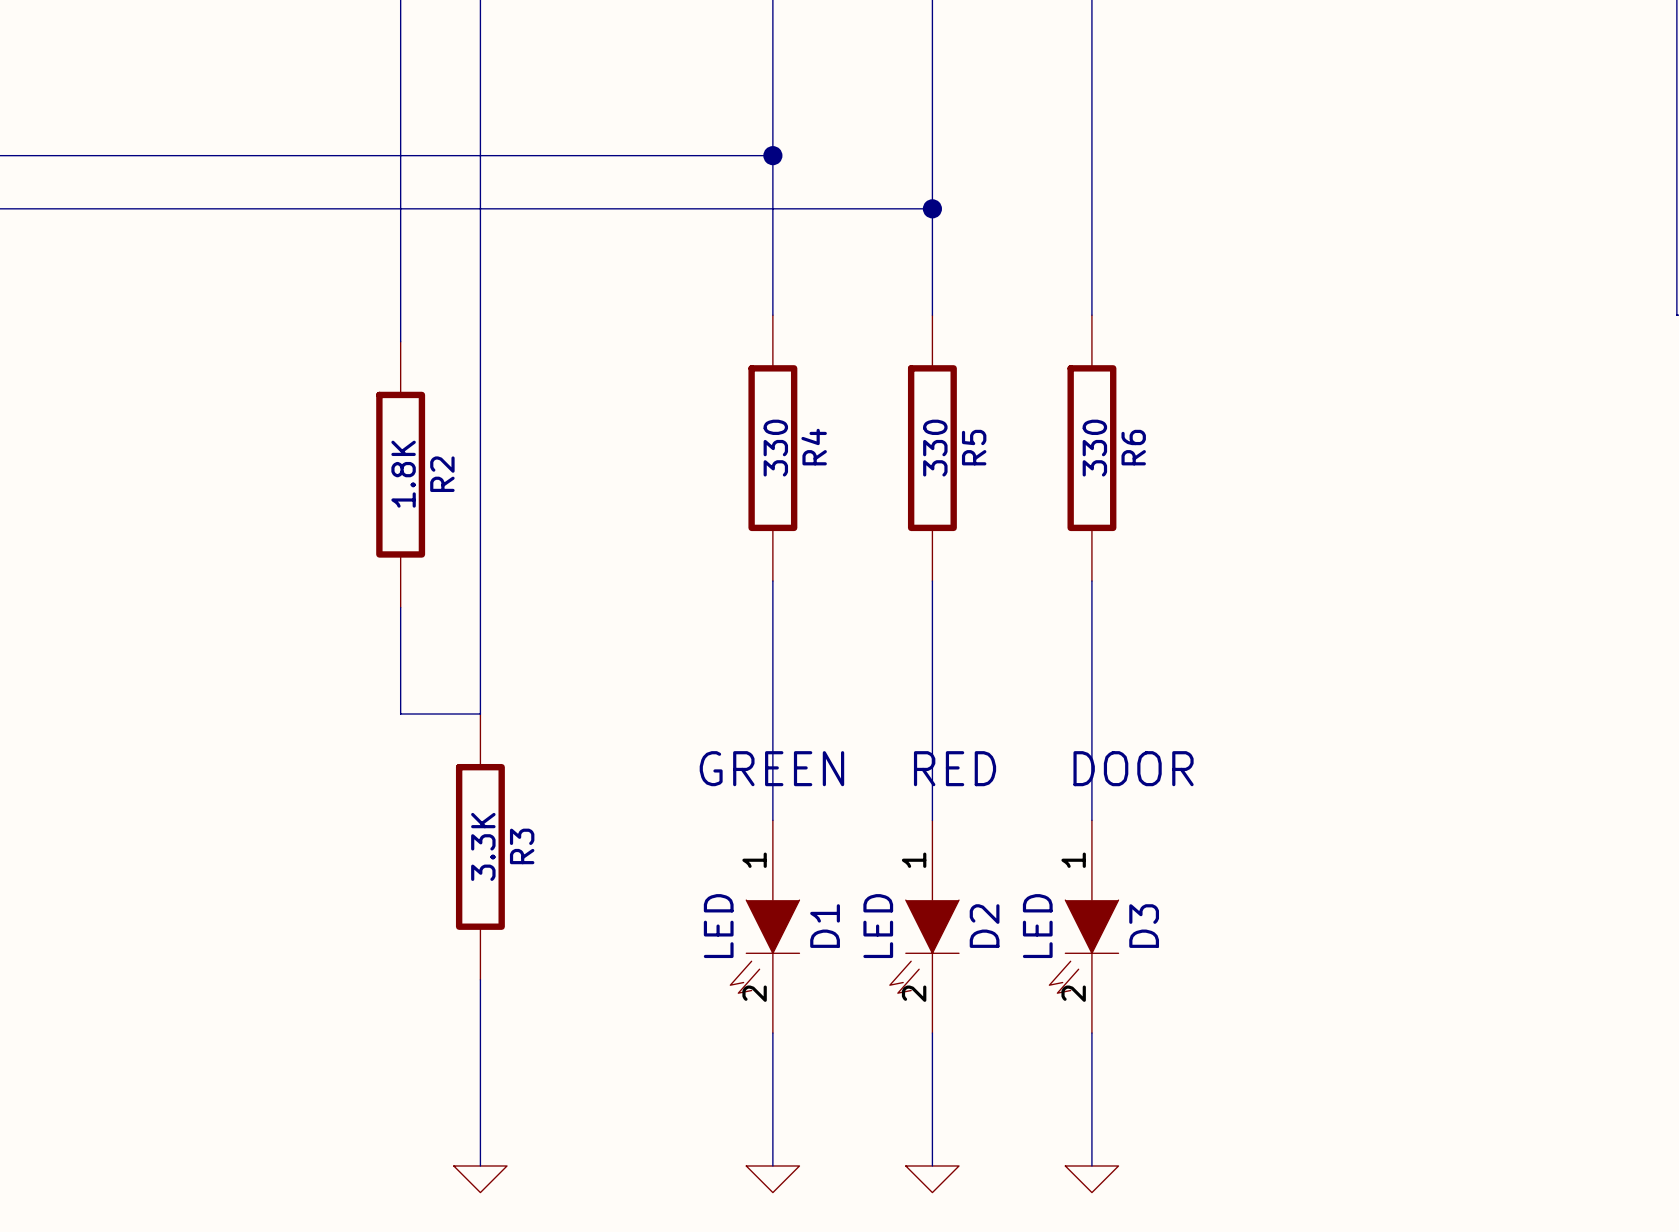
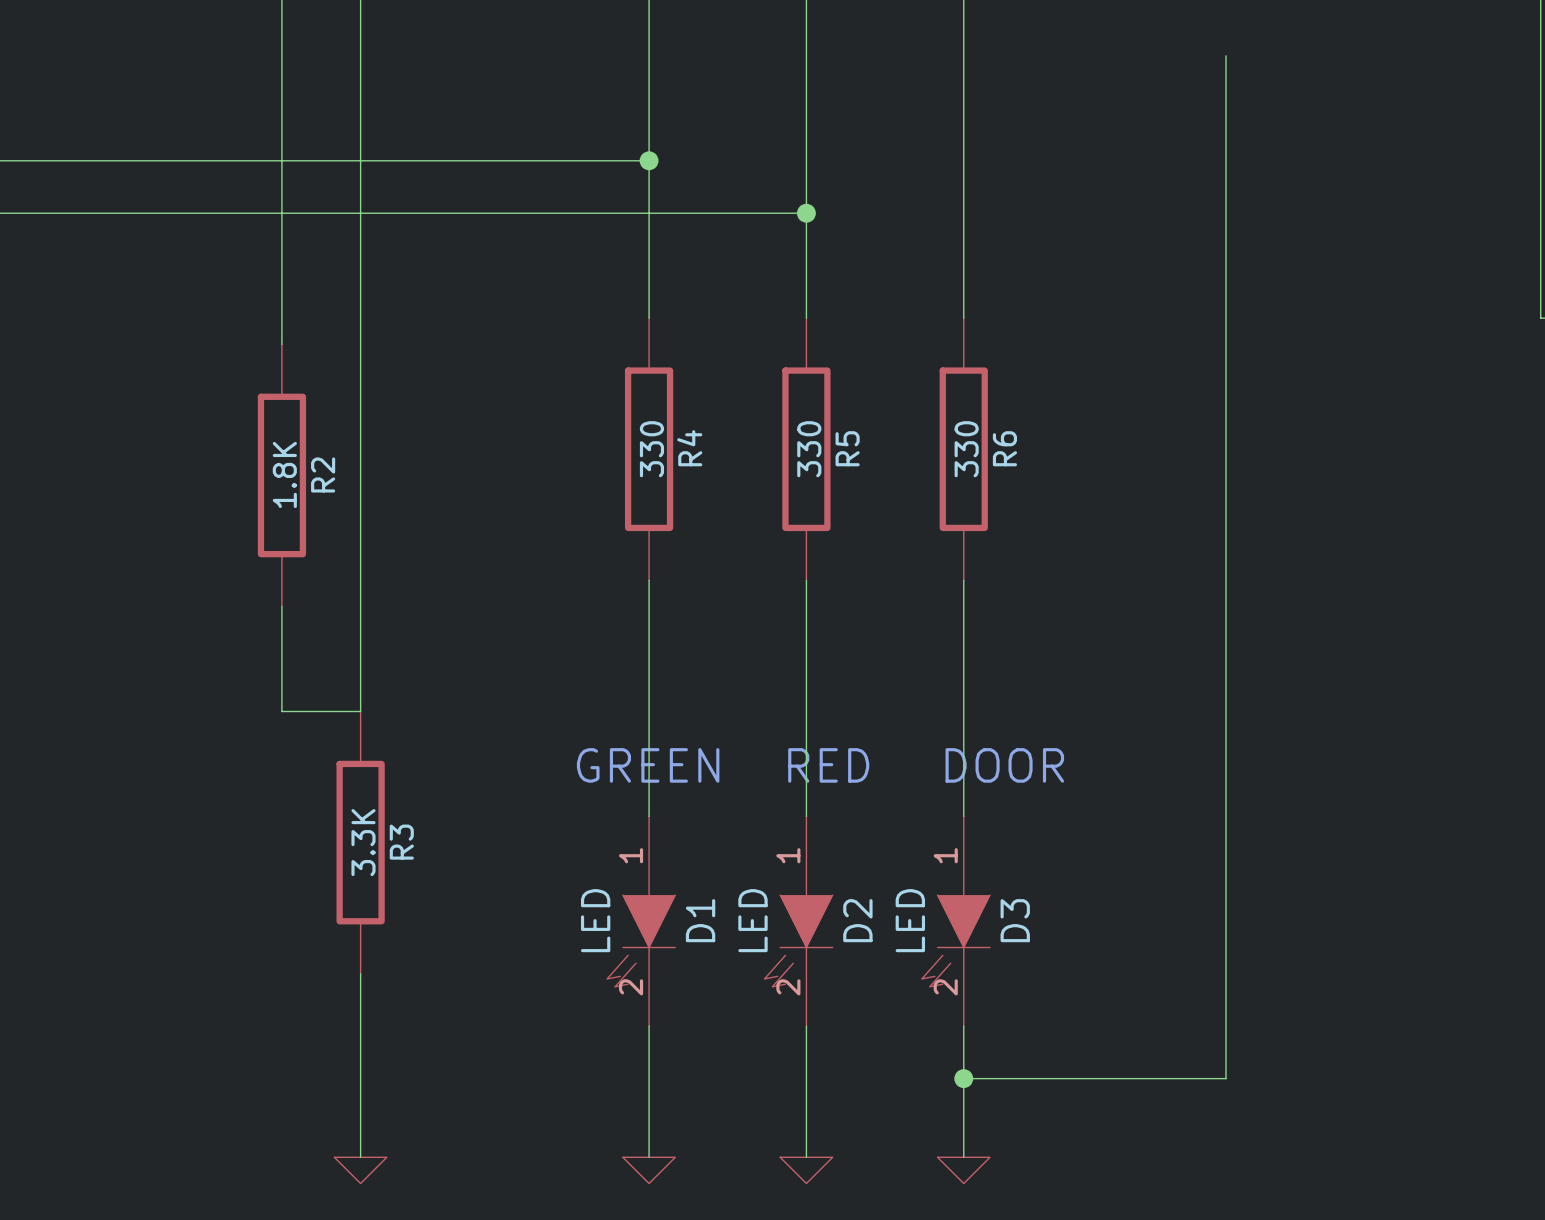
wire: none -> (1226, 55) (1226, 1078) (963, 1078)
junction: none -> (963, 1078)

